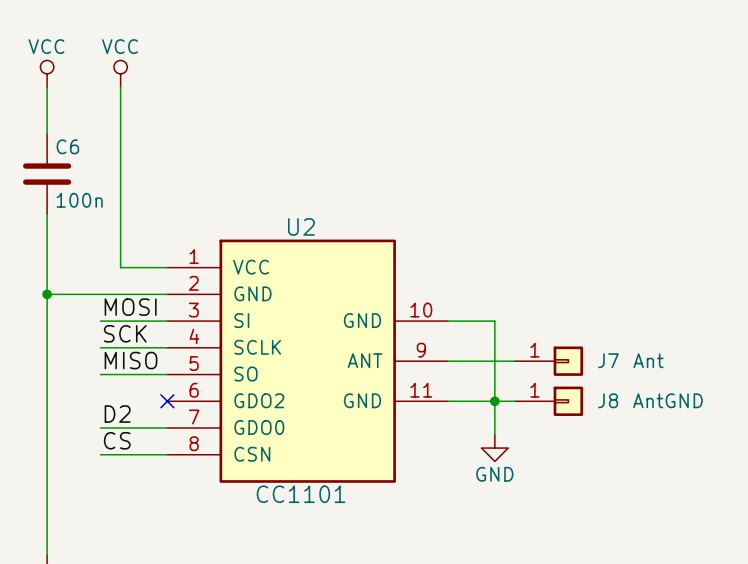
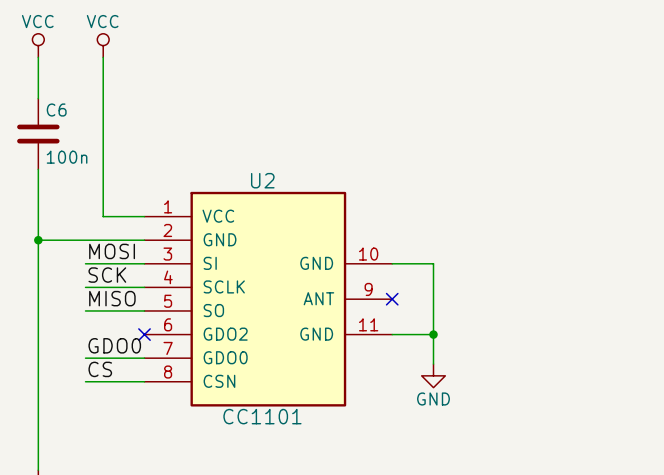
wire: (448, 361) (514, 361) -> none
no-connect mark: none -> (392, 299)
J7: Ant (548, 361) -> none
wire: (494, 401) (514, 401) -> none
J8: AntGND (548, 401) -> none
label: D2 (117, 414) -> GDO0 (114, 345)

